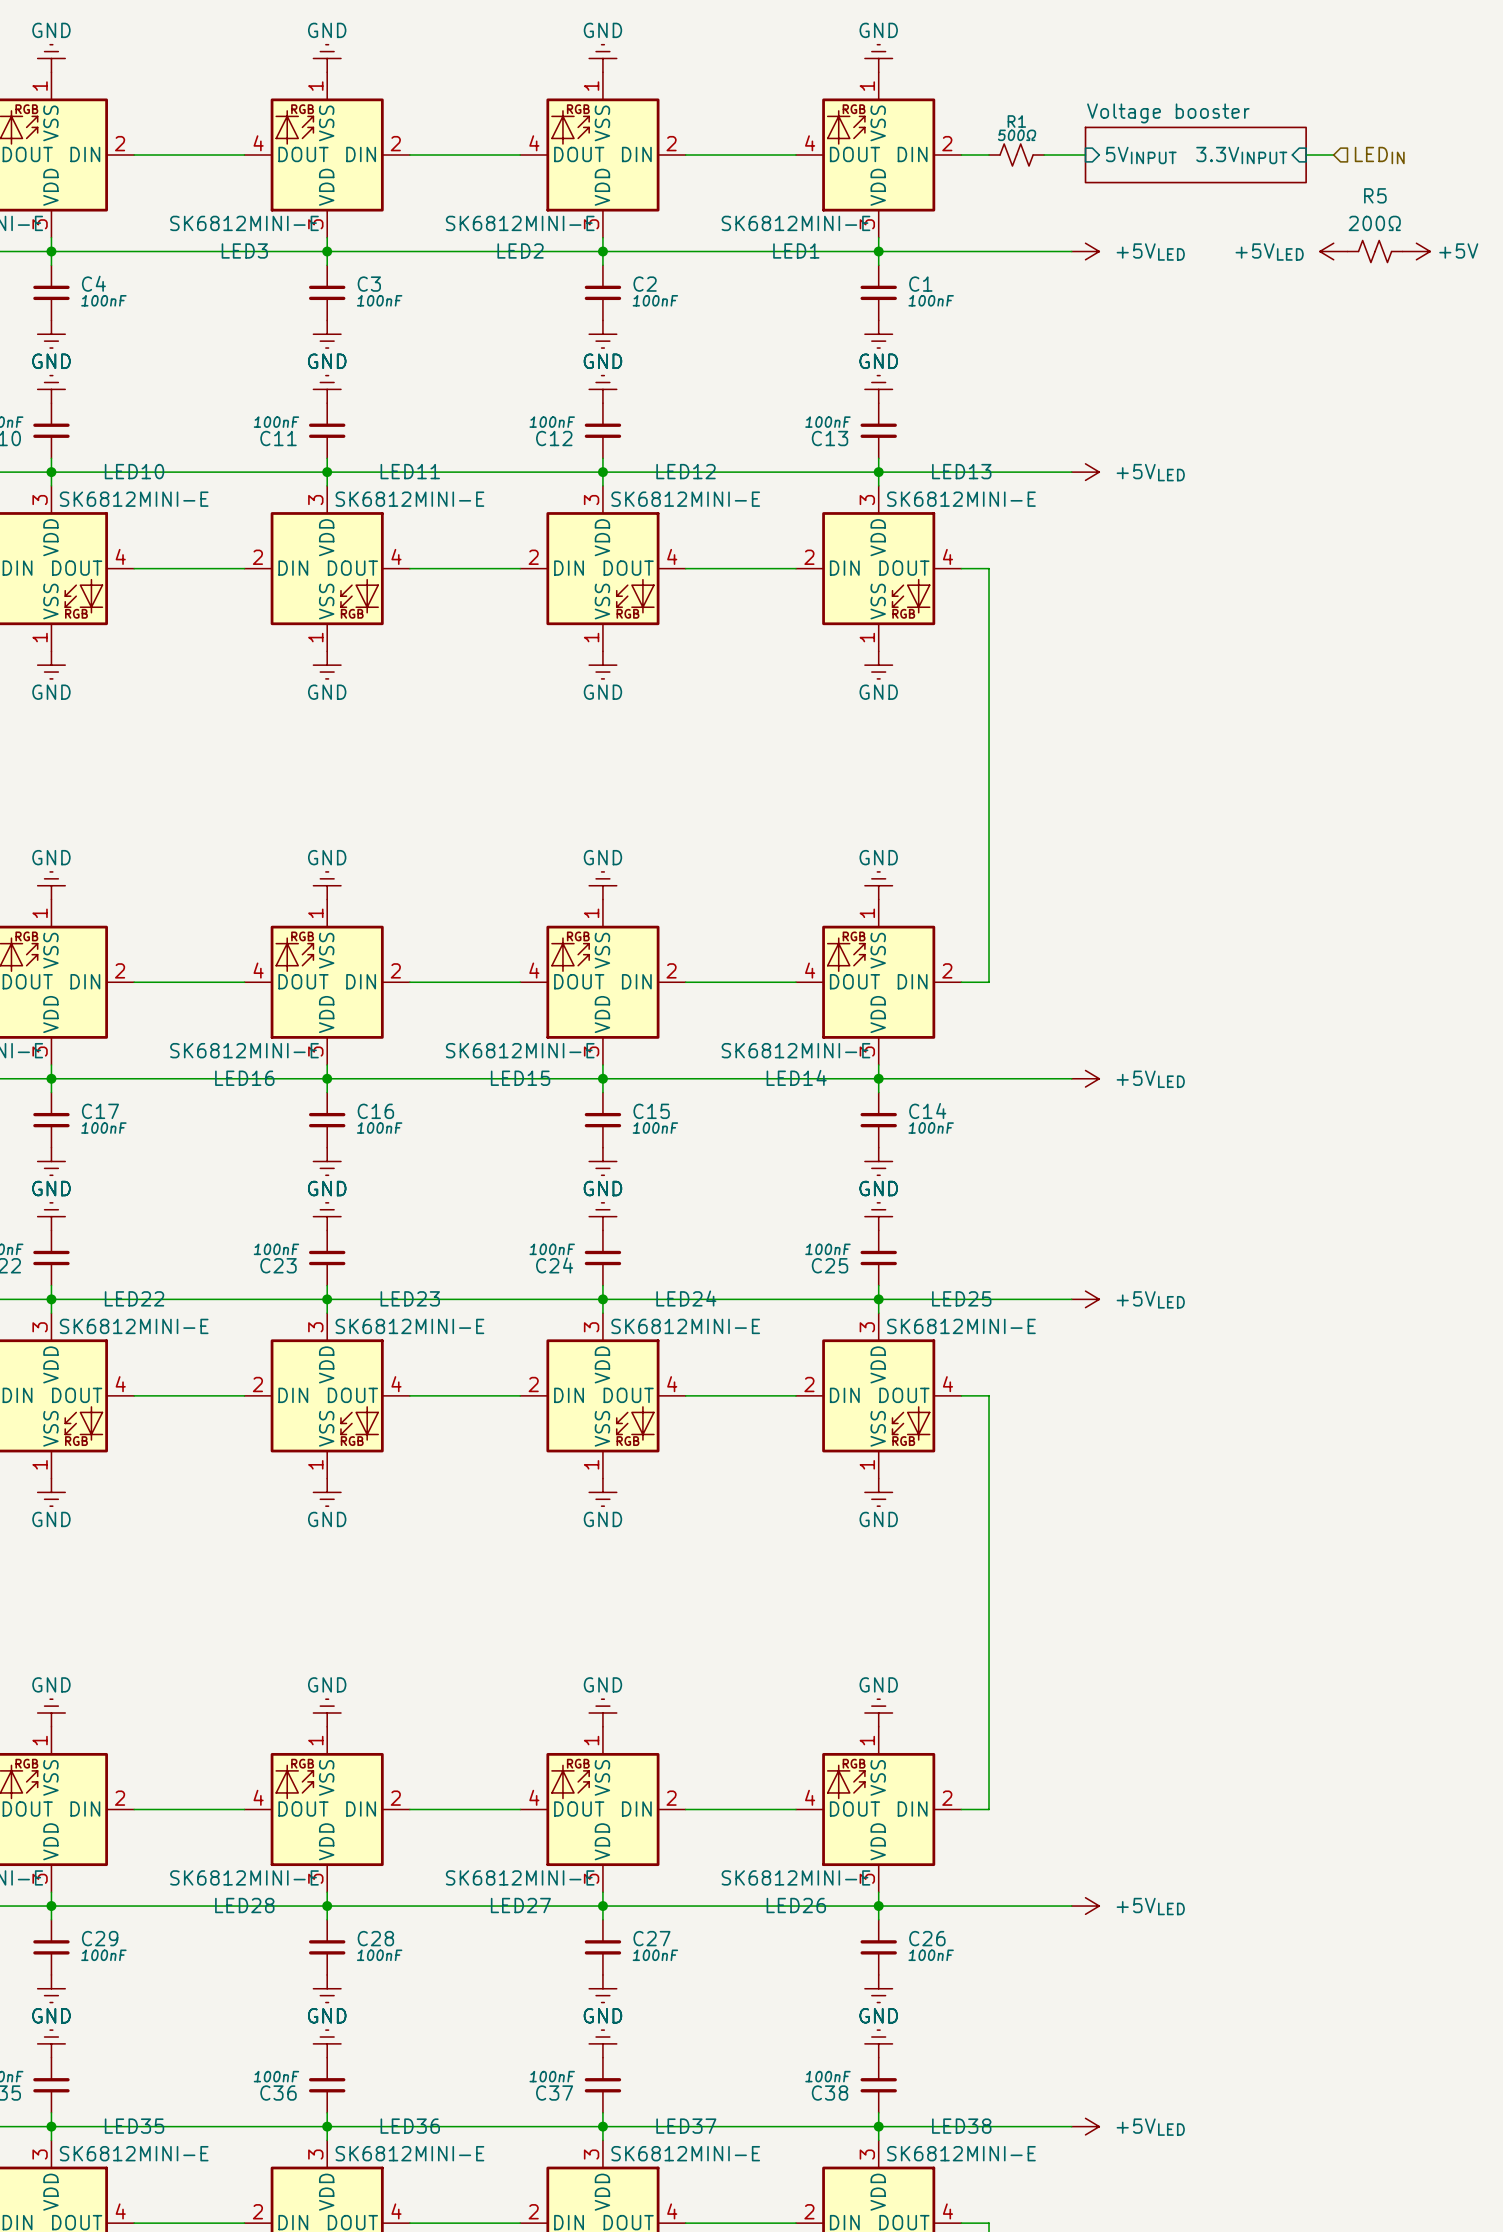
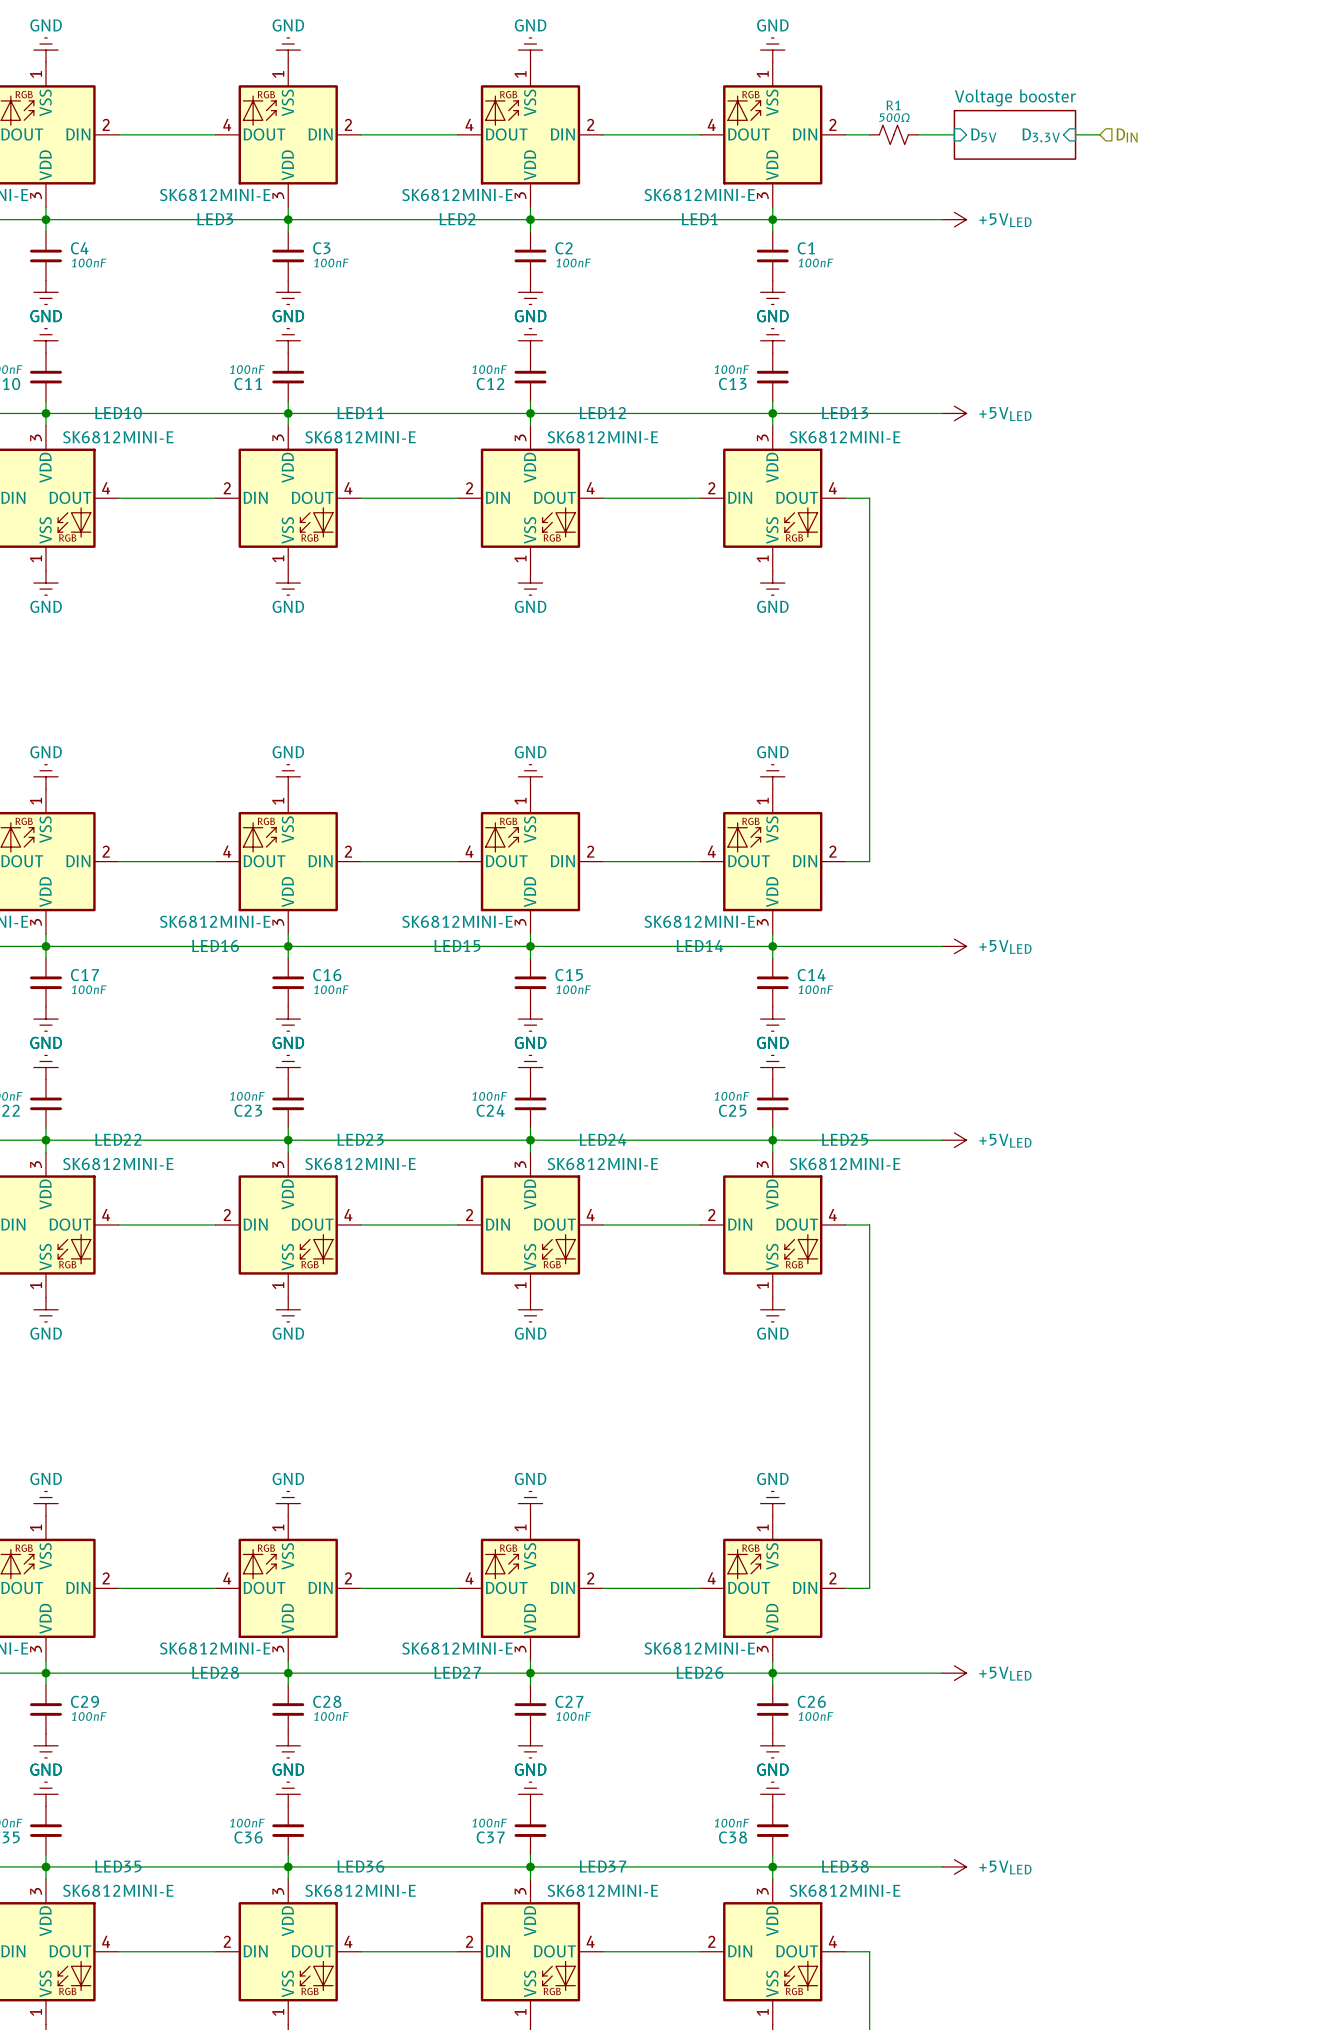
sheet pin: 5VINPUT (1141, 155) -> D5V (983, 135)
sheet Voltage booster: none -> (1014, 134)
sheet pin: none -> D3.3V (1041, 135)
sheet Voltage booster: (1195, 155) -> none
sheet pin: 3.3VINPUT (1241, 155) -> none
wire: (1306, 155) (1333, 155) -> (1075, 134) (1099, 134)
hierarchical label: LEDIN (1379, 155) -> DIN (1127, 135)
power symbol: +5VLED (1333, 251) -> none
R5: 200Ω (1375, 251) -> none
power symbol: +5V (1416, 251) -> none

